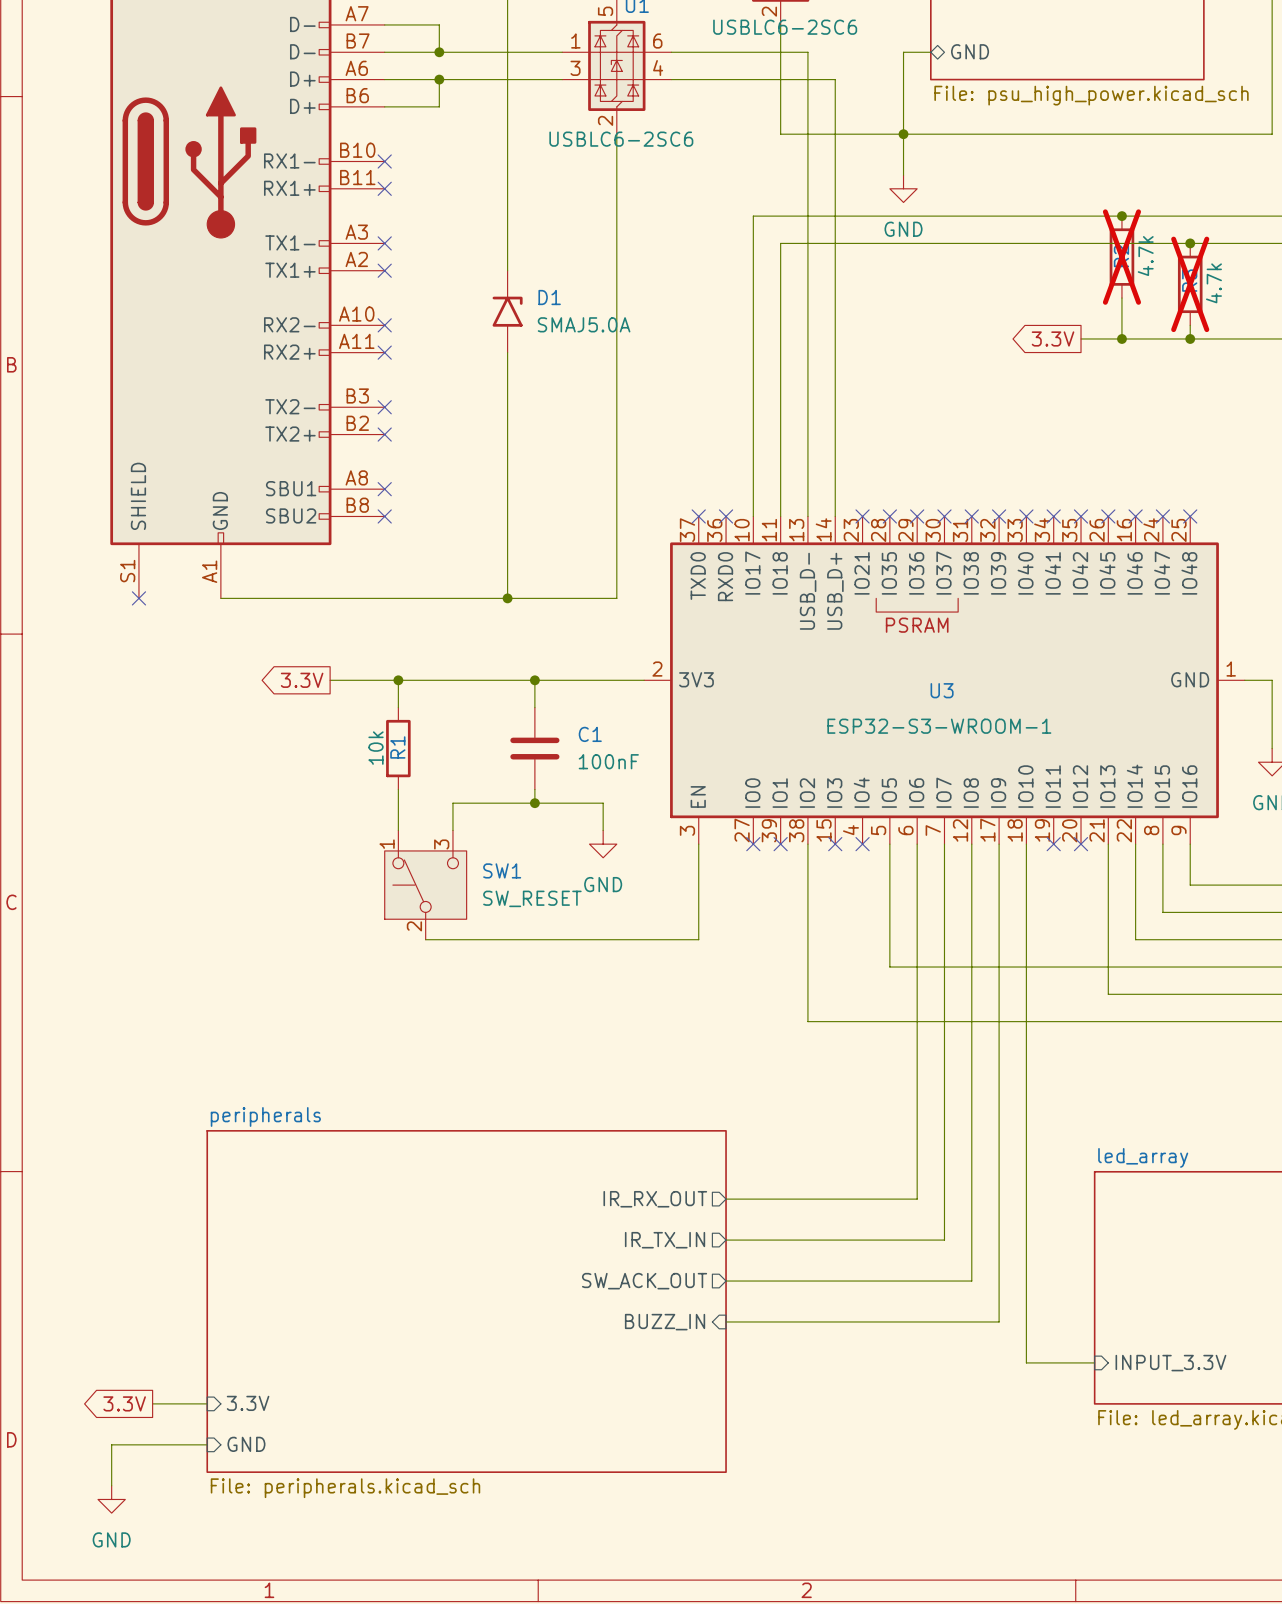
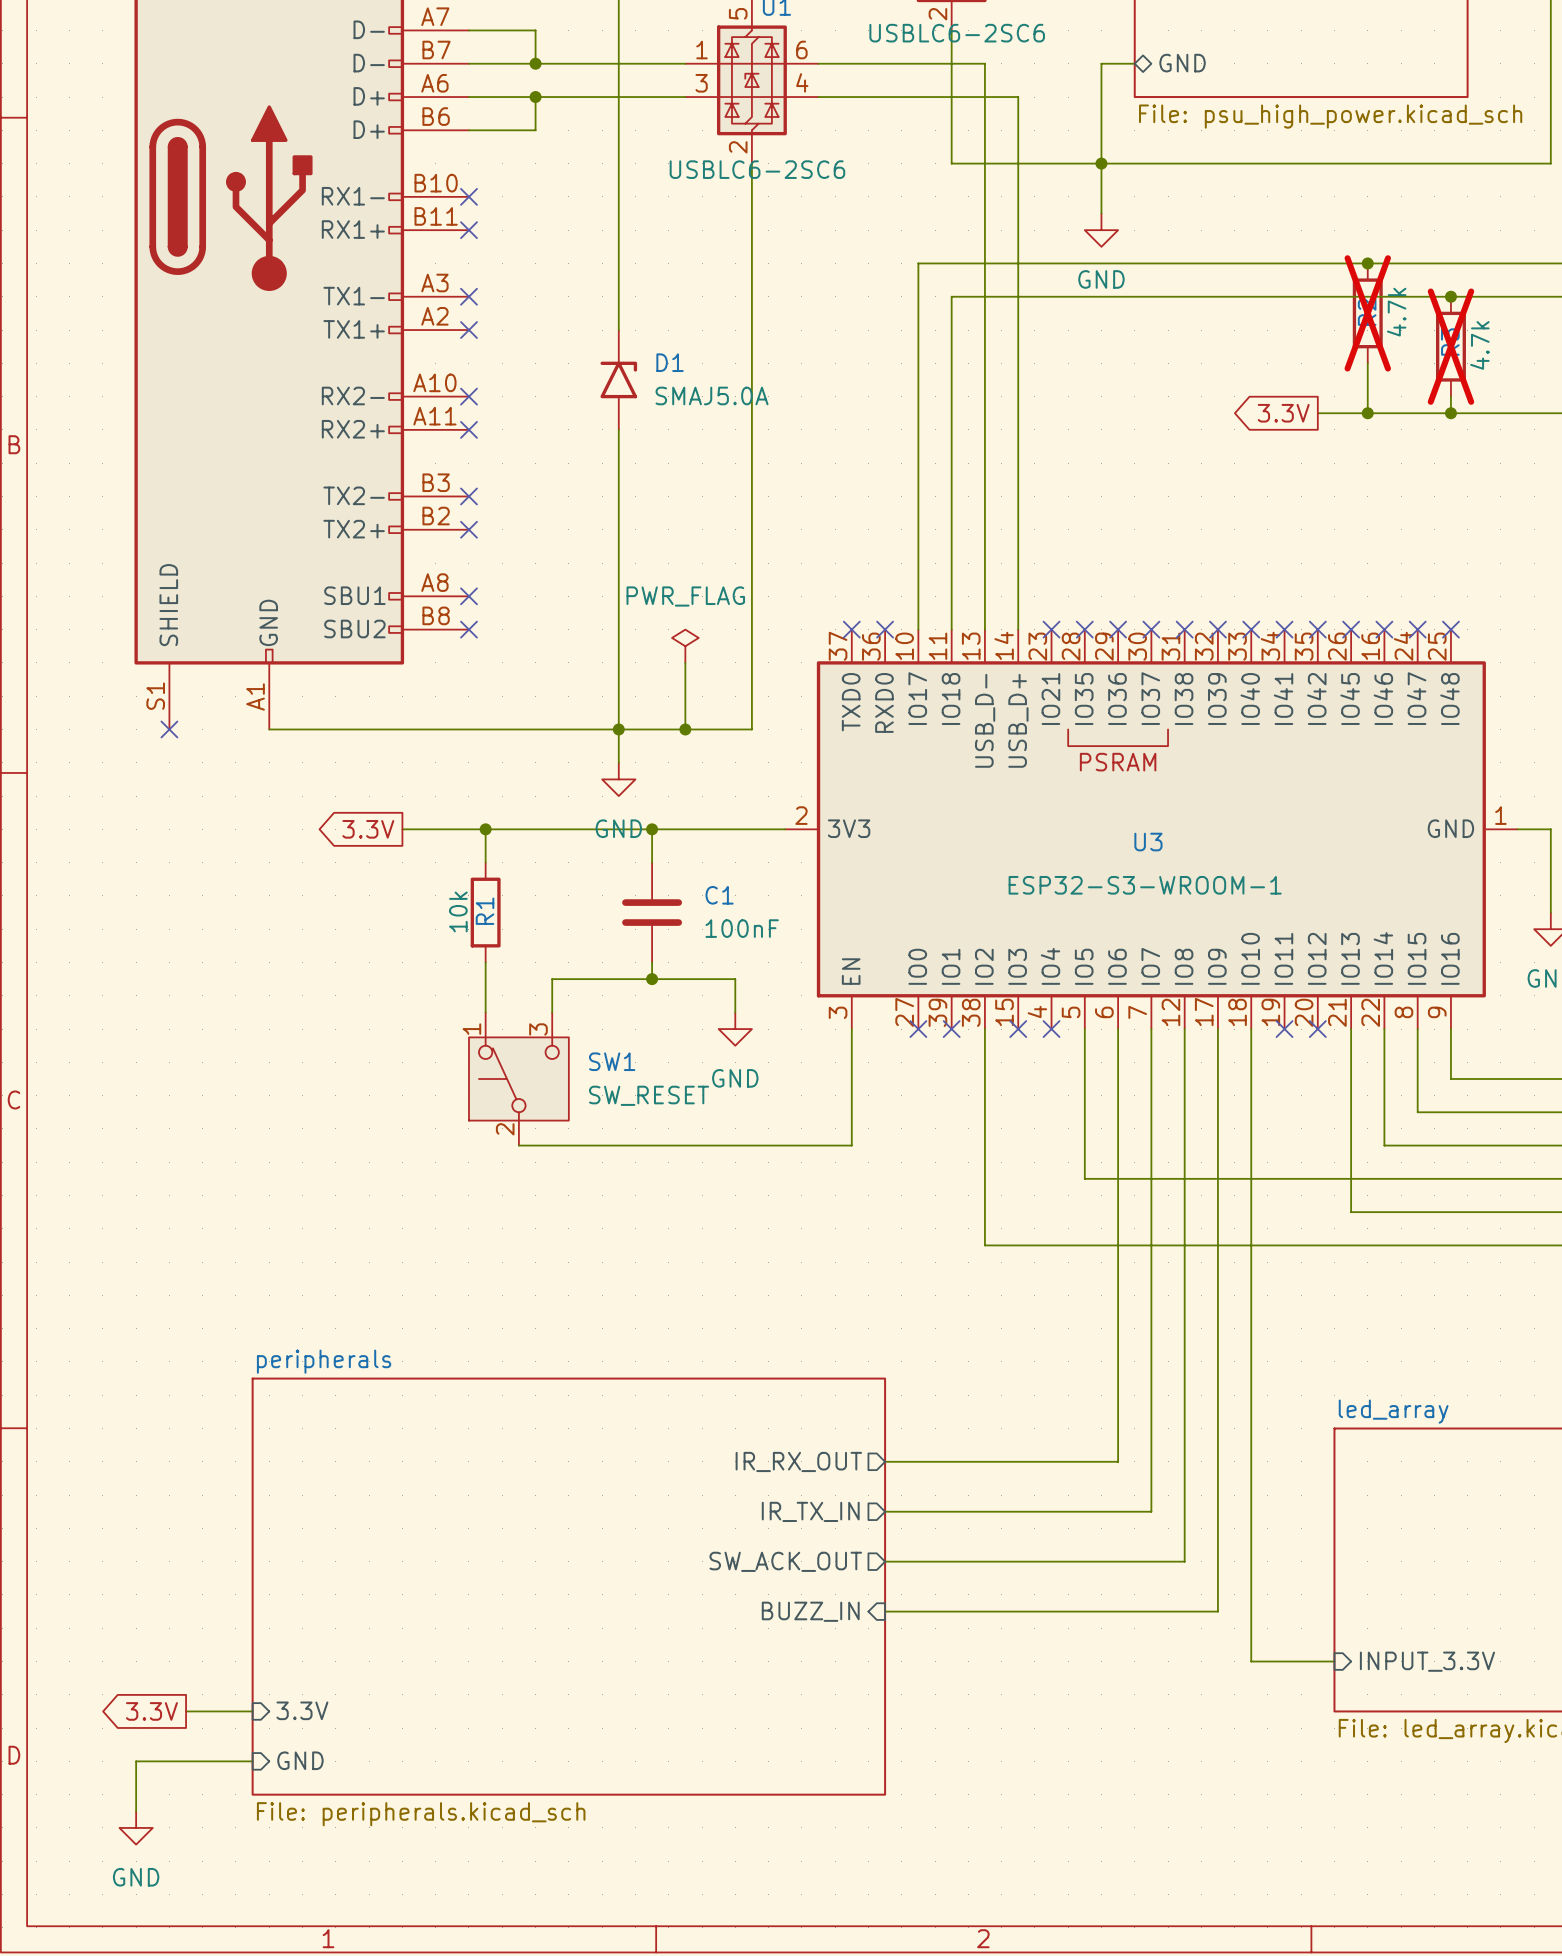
power symbol: none -> PWR_FLAG (685, 646)
wire: none -> (685, 662) (685, 729)
wire: none -> (618, 729) (618, 762)
junction: none -> (685, 729)
power symbol: none -> GND (618, 779)

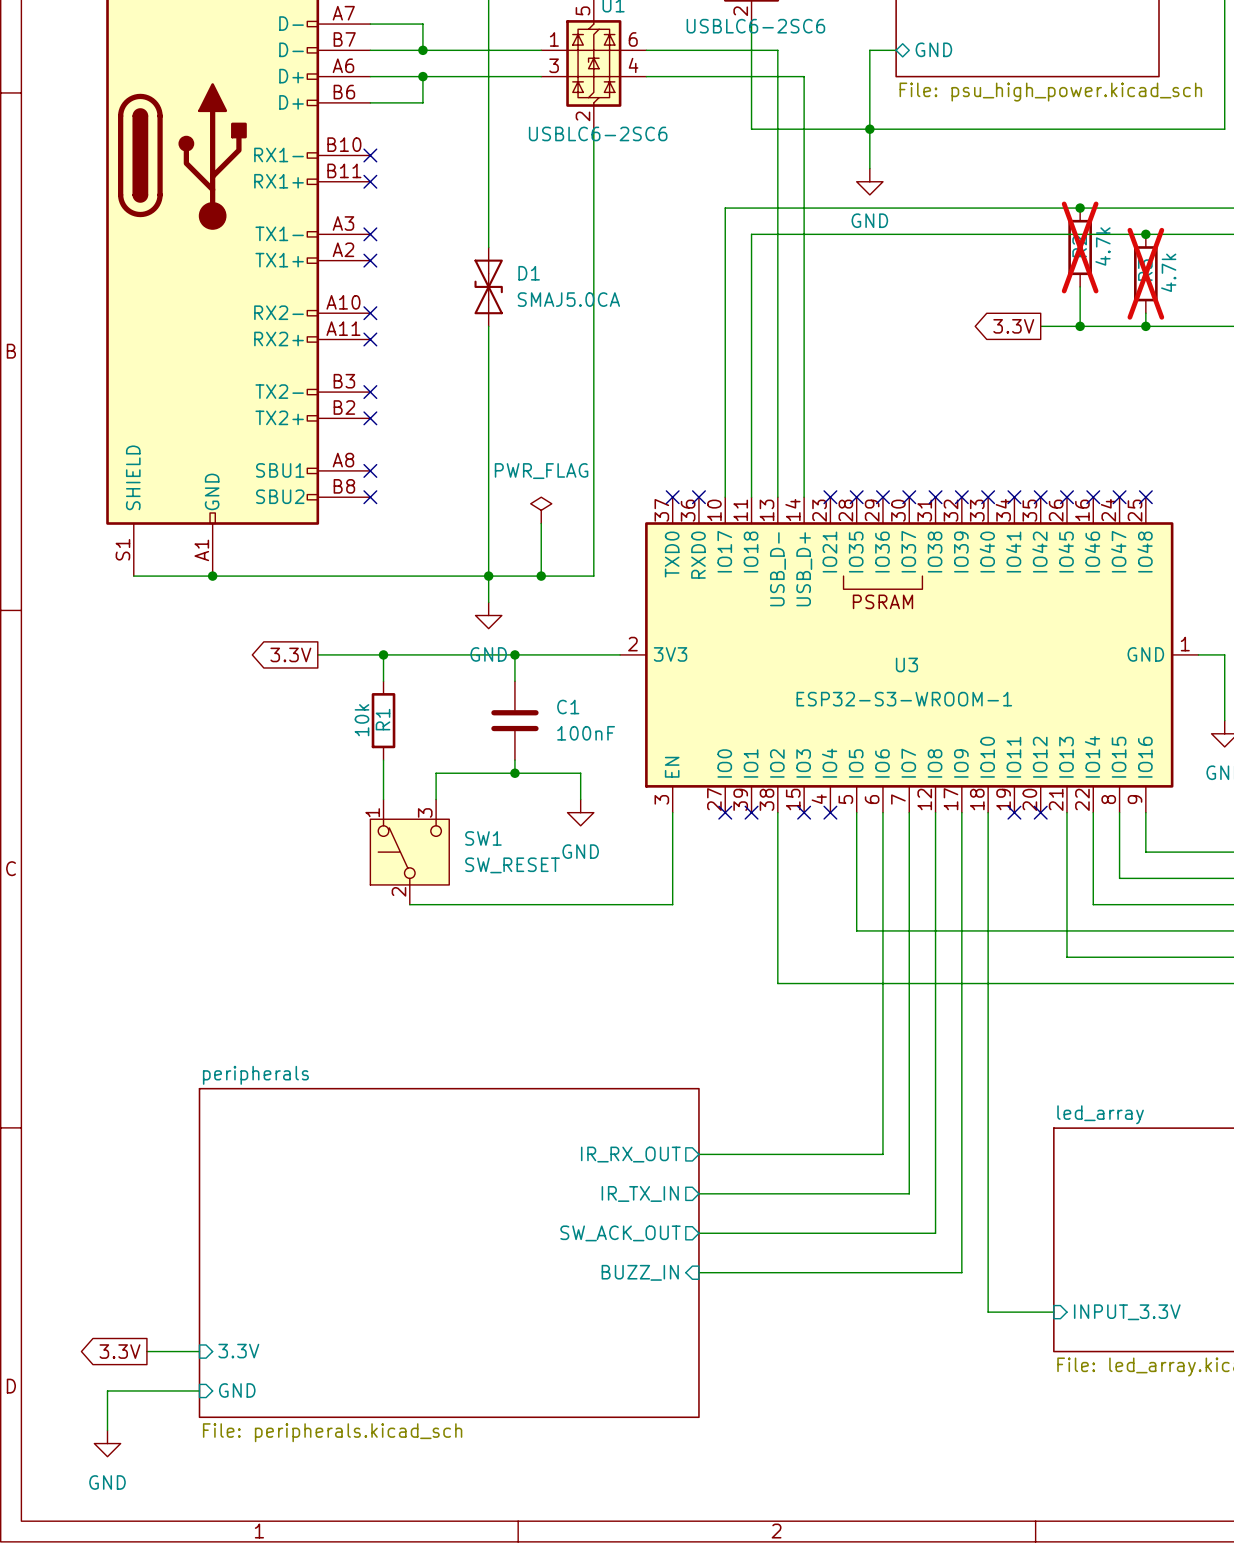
D1 symbol: [600, 330, 638, 430] -> [474, 247, 503, 327]
D1 value: SMAJ5.0A (712, 395) -> SMAJ5.0CA (568, 299)
wire: none -> (133, 576) (212, 576)
no-connect mark: (169, 729) -> none
junction: none -> (212, 576)

